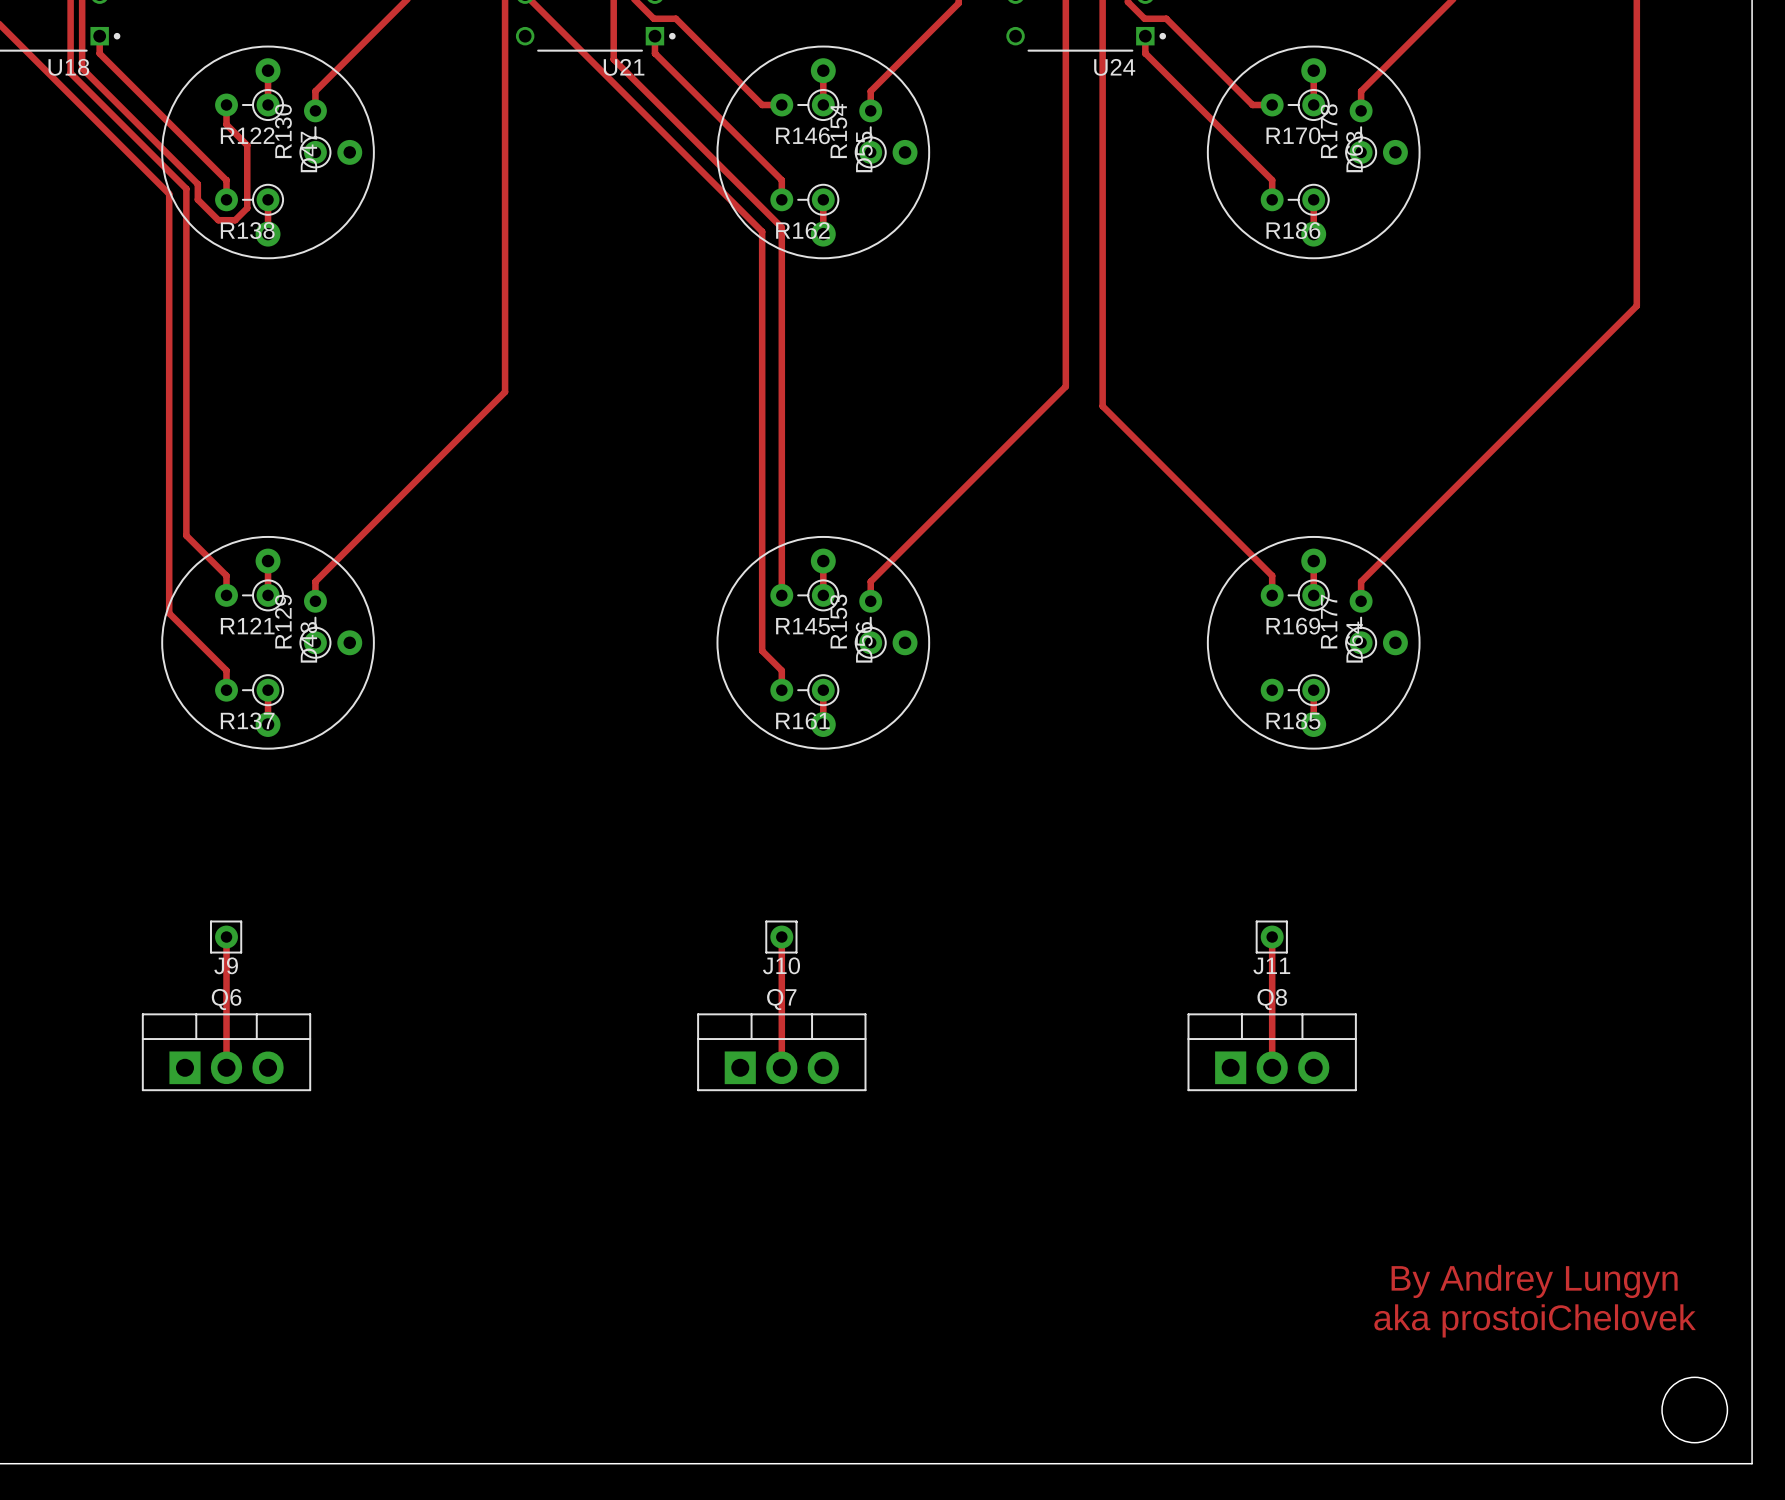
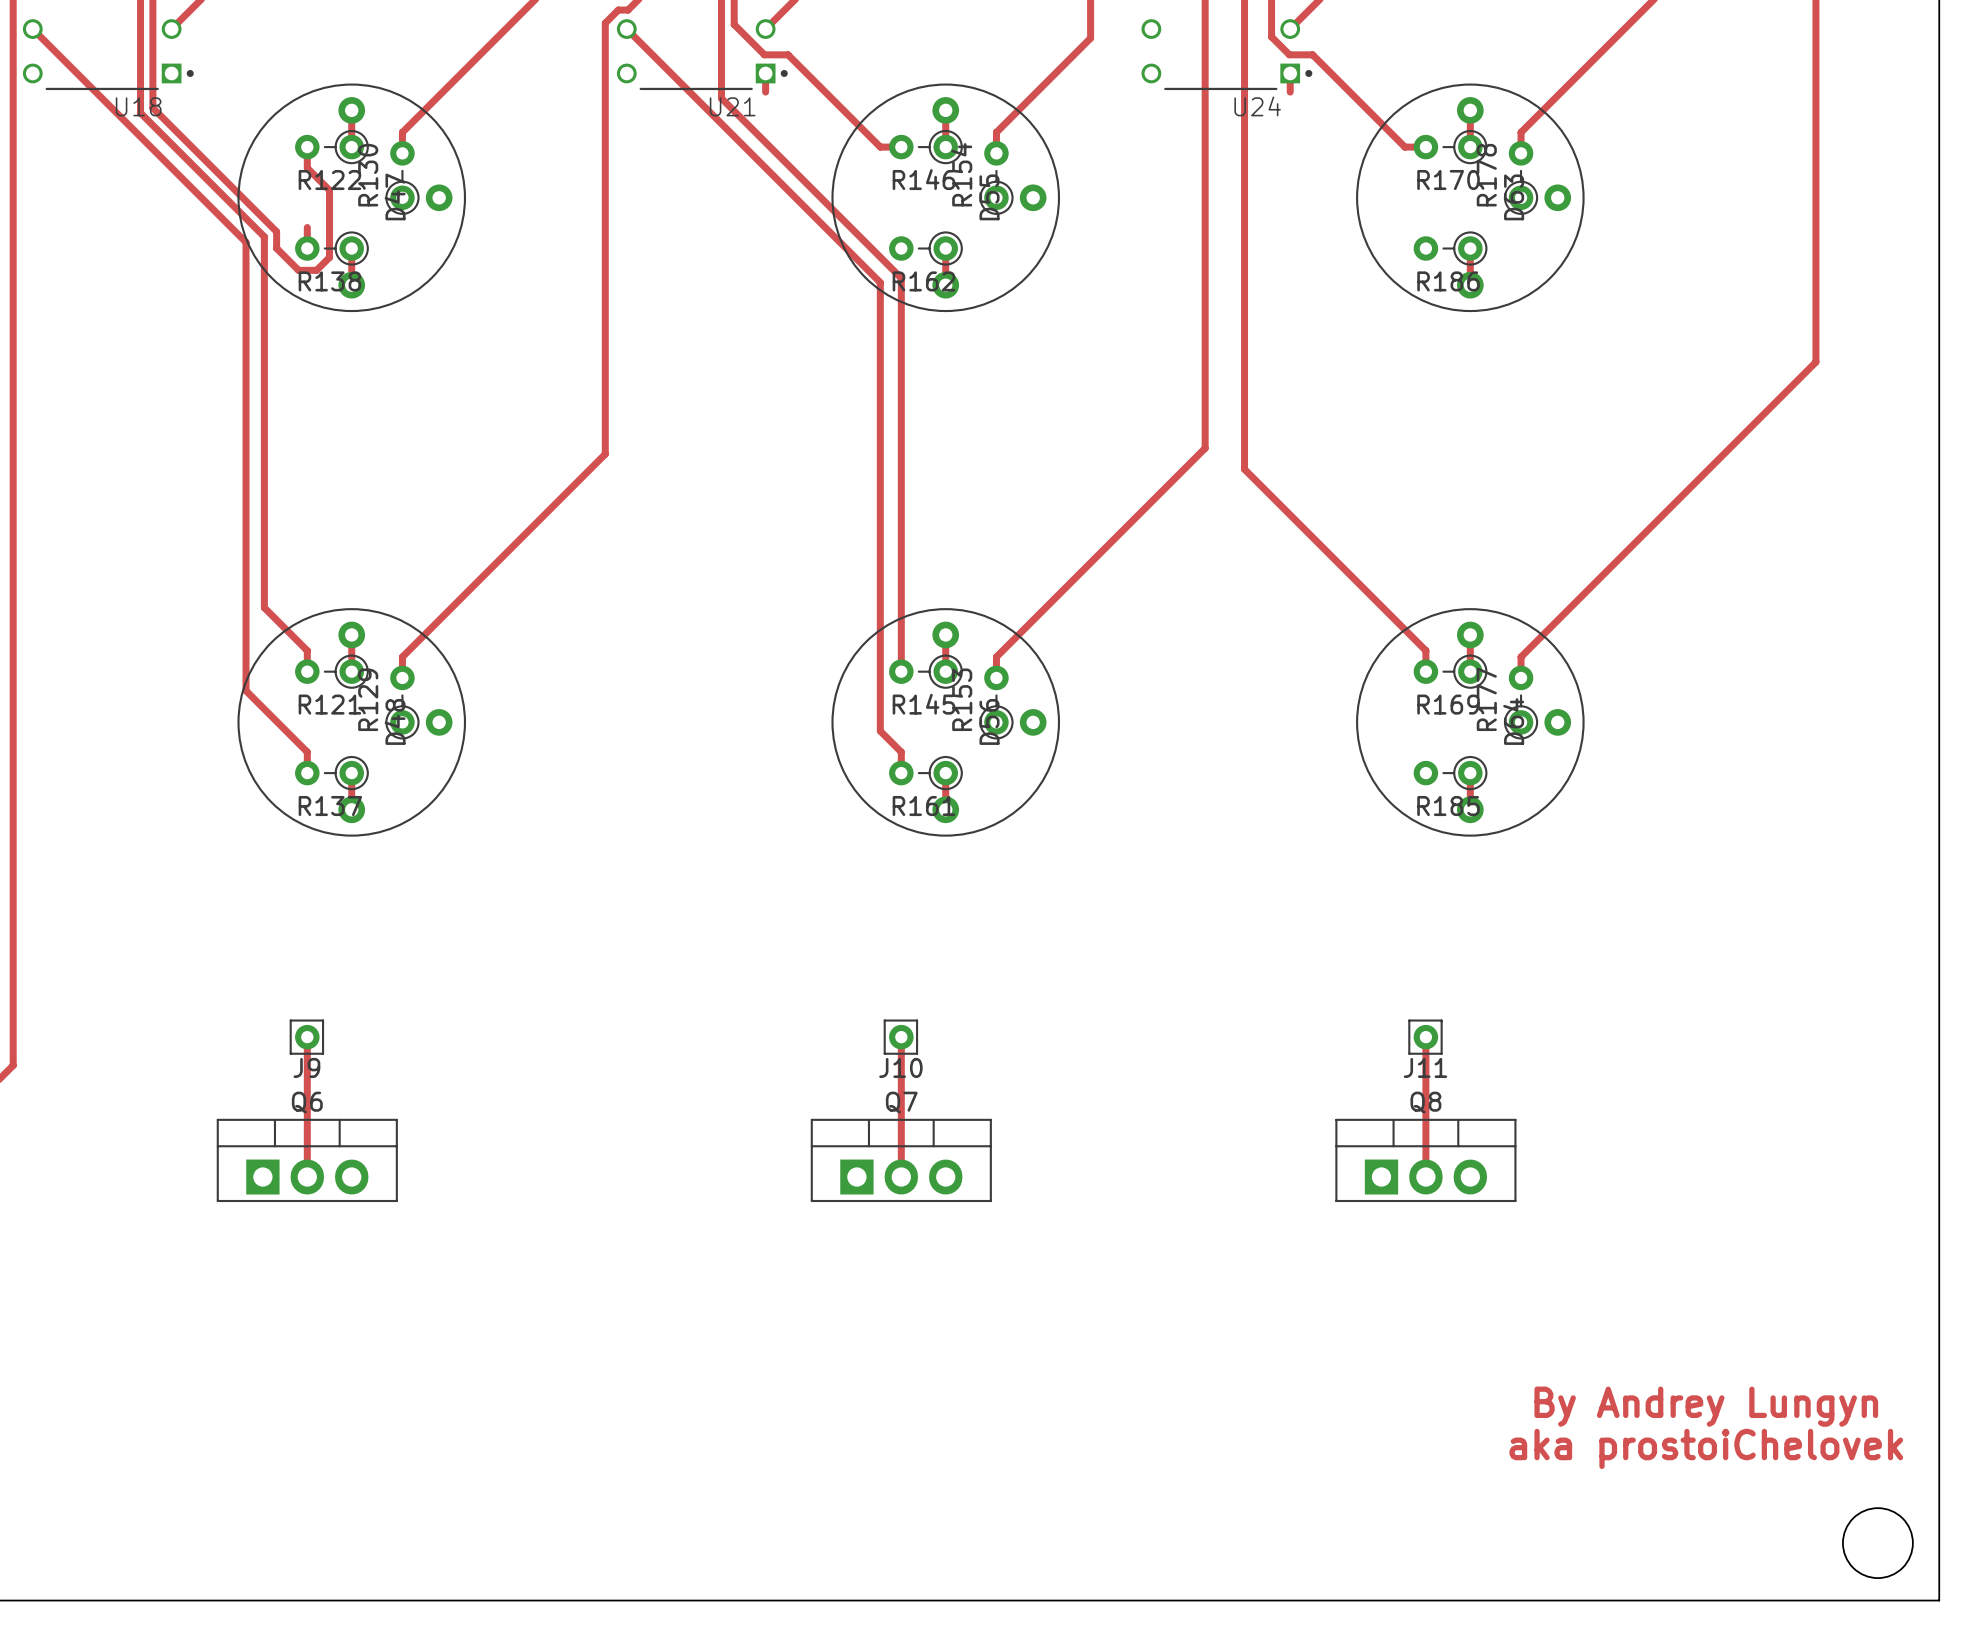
track: (99, 36) (99, 53) (226, 180) -> none
track: (655, 53) (781, 180) (781, 199) -> none
track: (1145, 53) (1272, 180) (1272, 199) -> none

